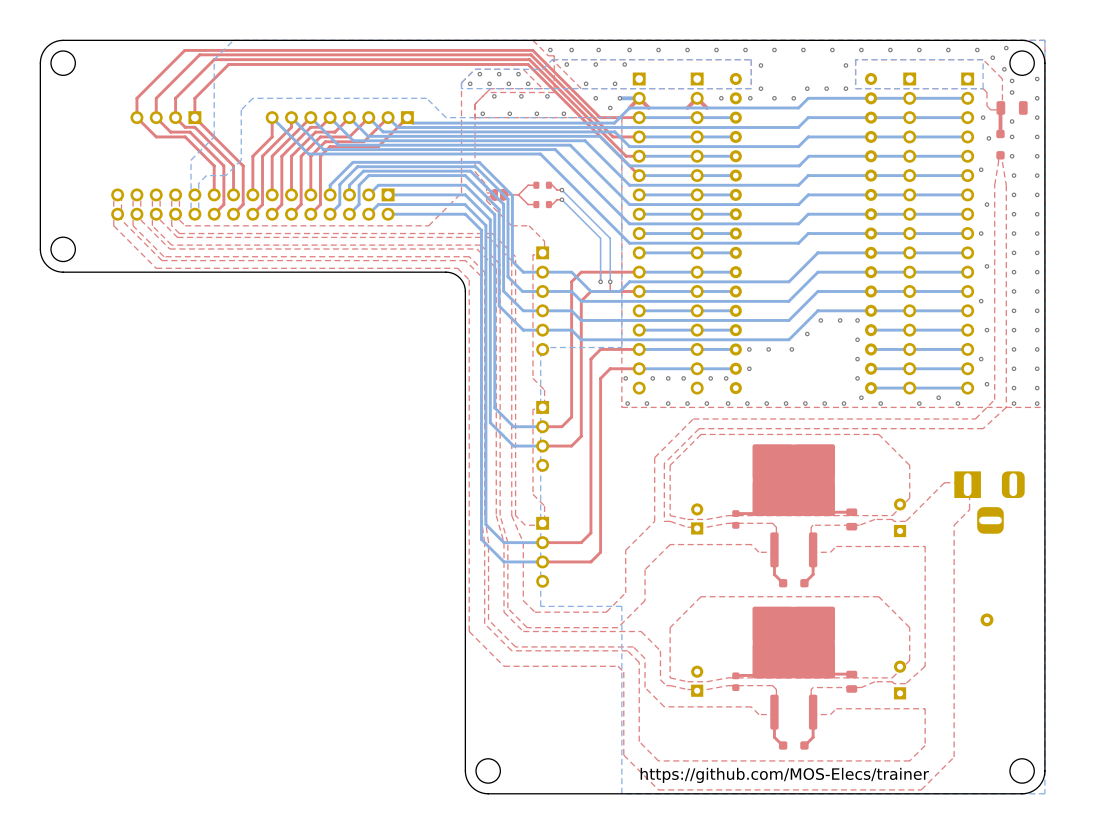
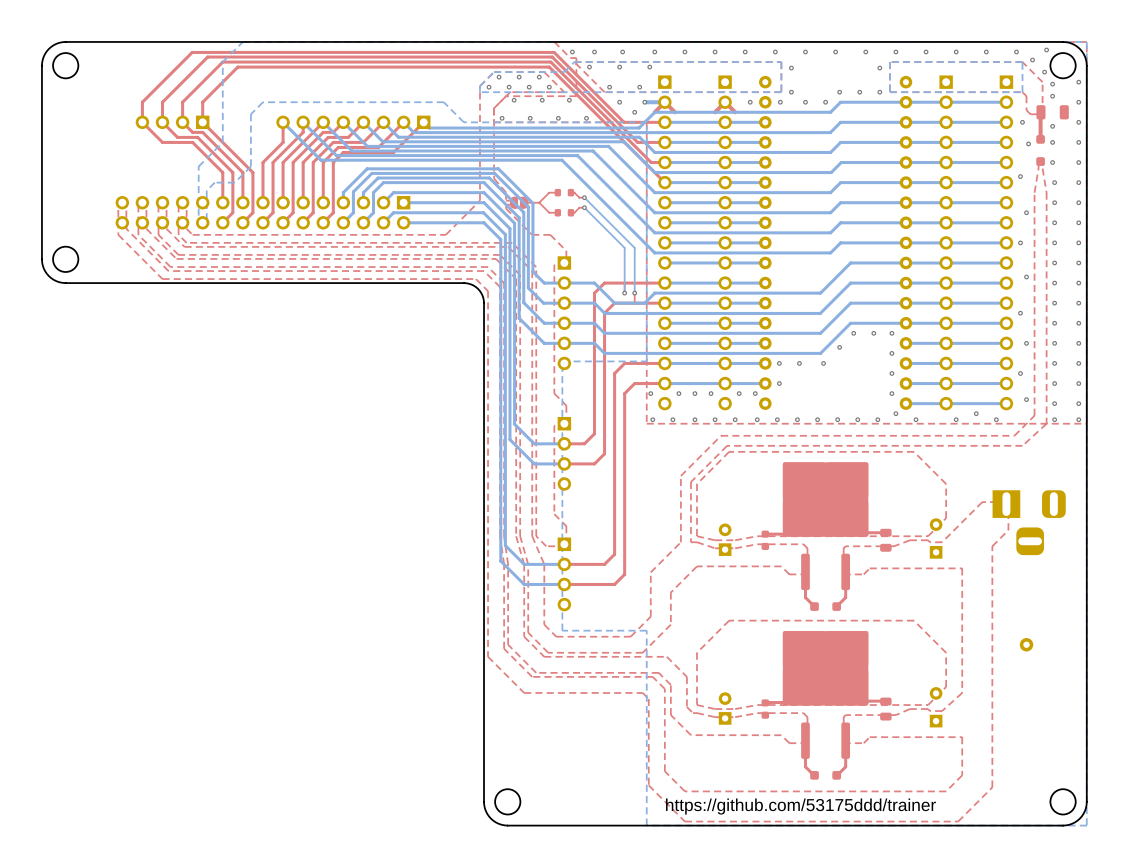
text: https://github.com/MOS-Elecs/trainer (784, 775) -> https://github.com/53175ddd/trainer (800, 806)

